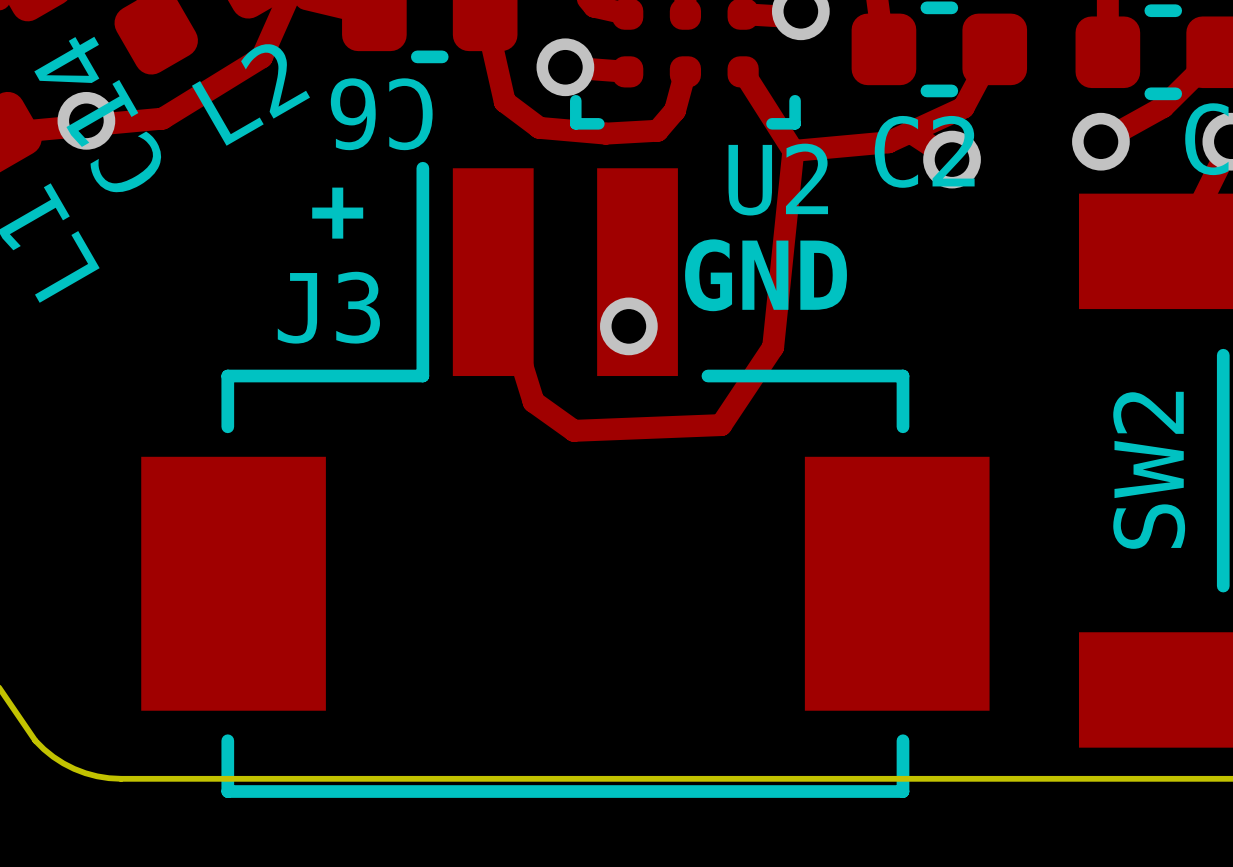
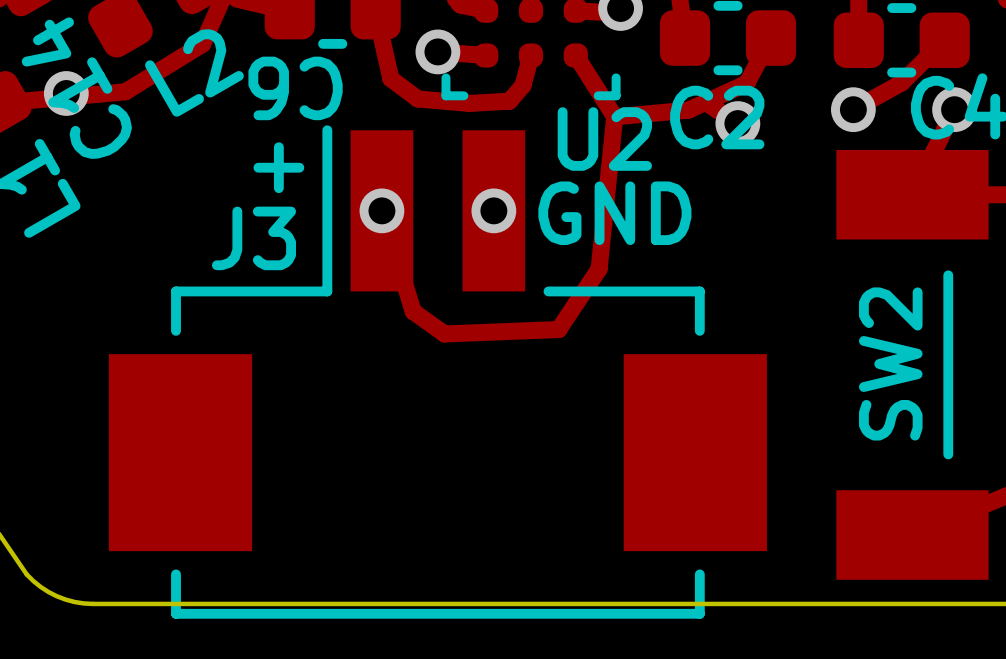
via: none -> (381, 210)
via position: (628, 326) -> (493, 210)

